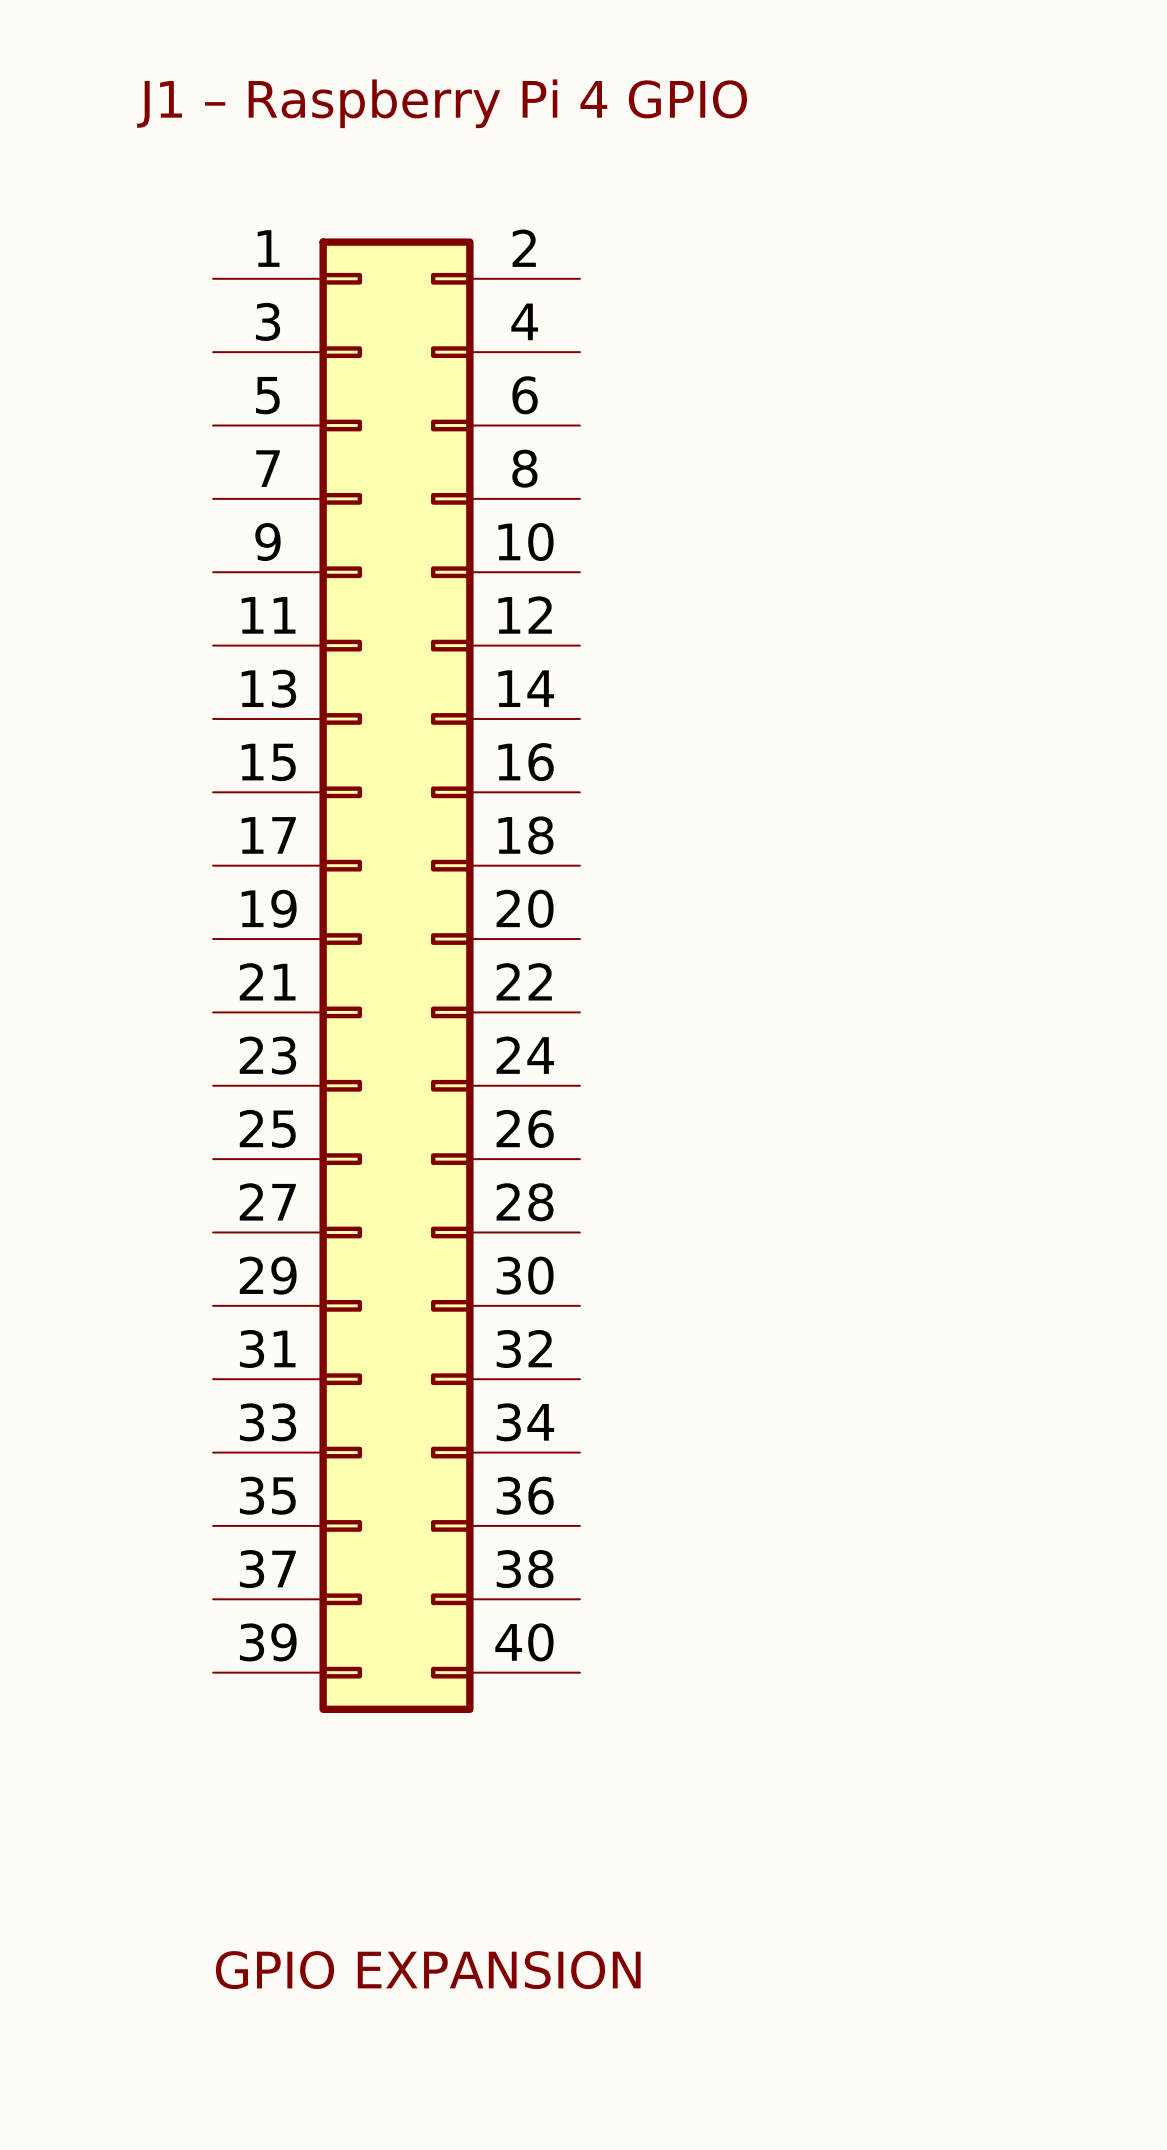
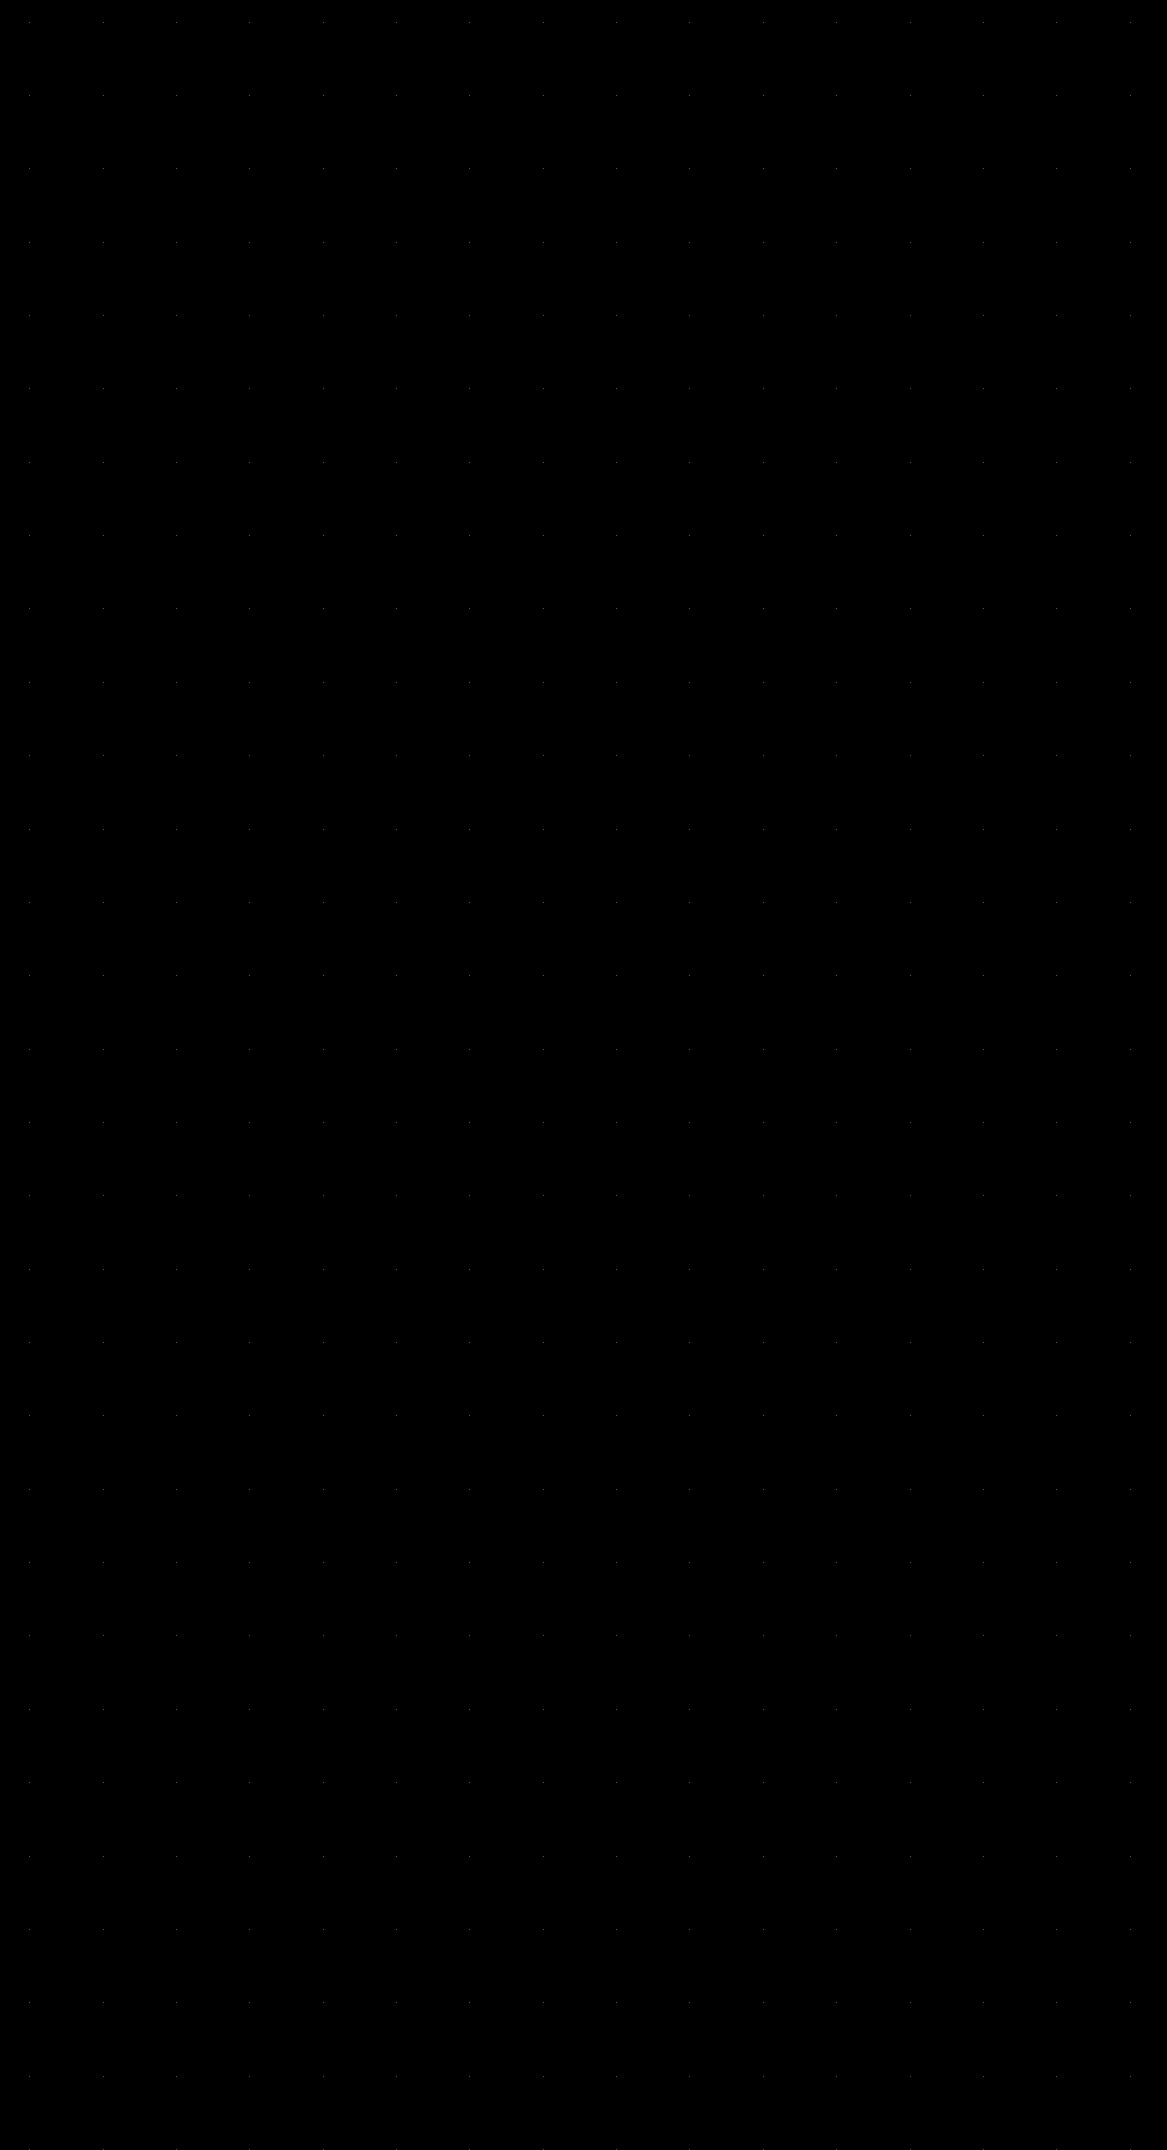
label: J1 – Raspberry Pi 4 GPIO (442, 103) -> none
part: (396, 975) -> none
label: GPIO EXPANSION (428, 1970) -> none

